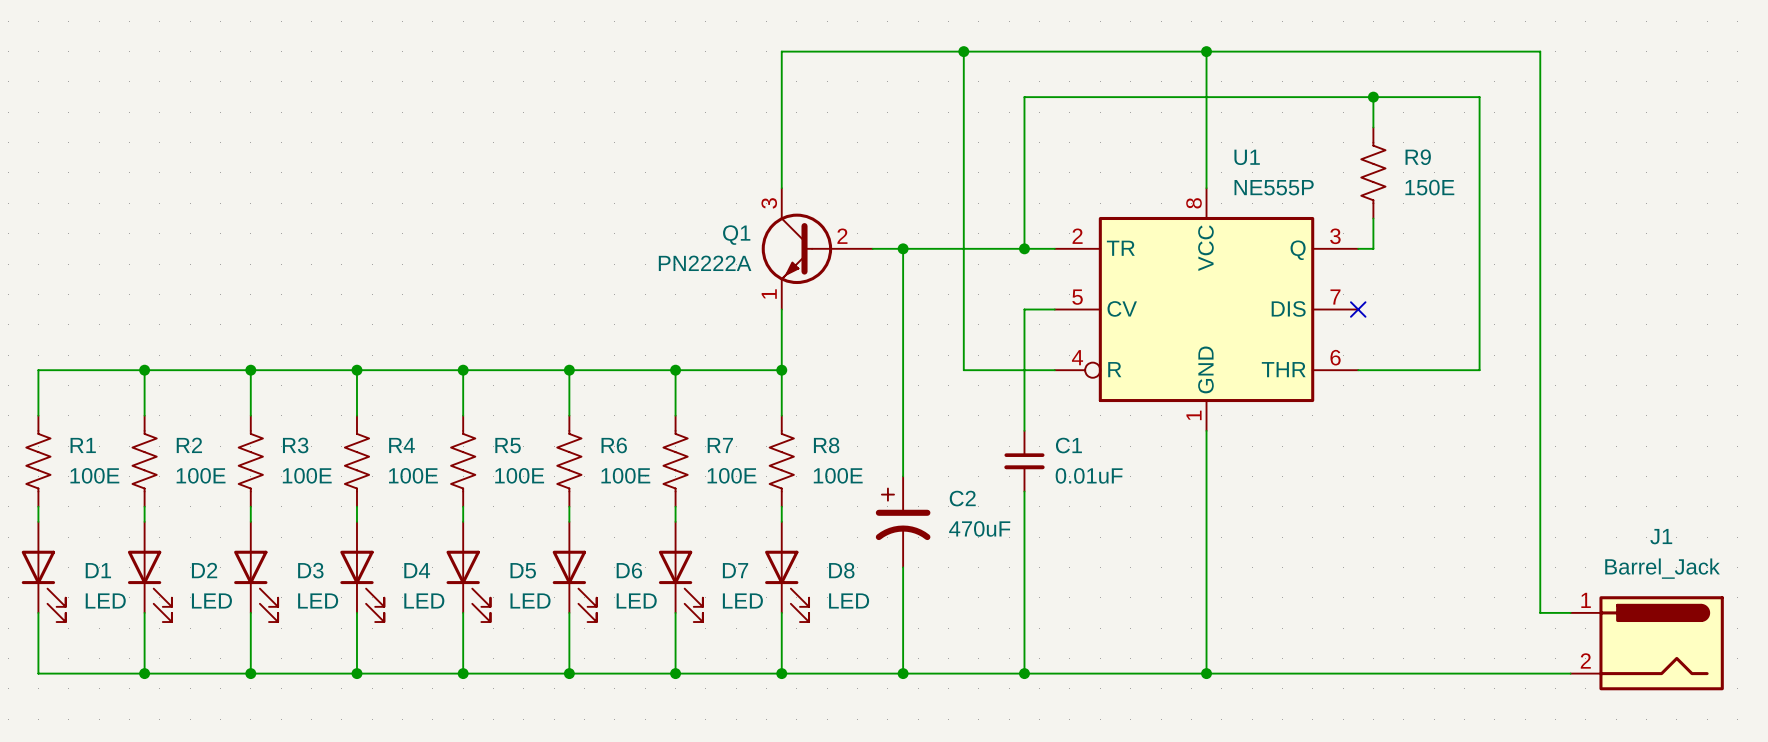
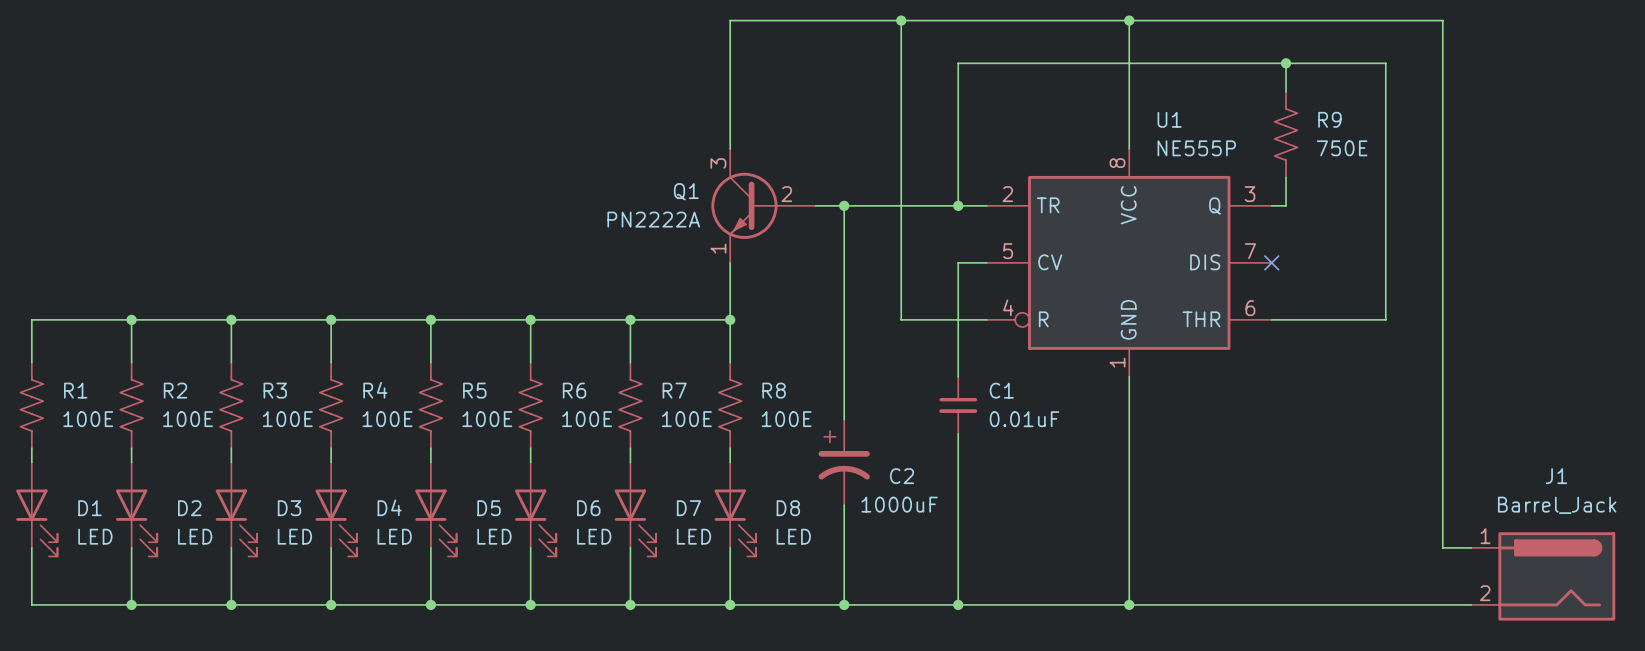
R9 value: 150E (1429, 187) -> 750E (1342, 148)
C2 name position: C2 (962, 498) -> C2 (902, 476)
C2 value: 470uF (979, 528) -> 1000uF (899, 504)

